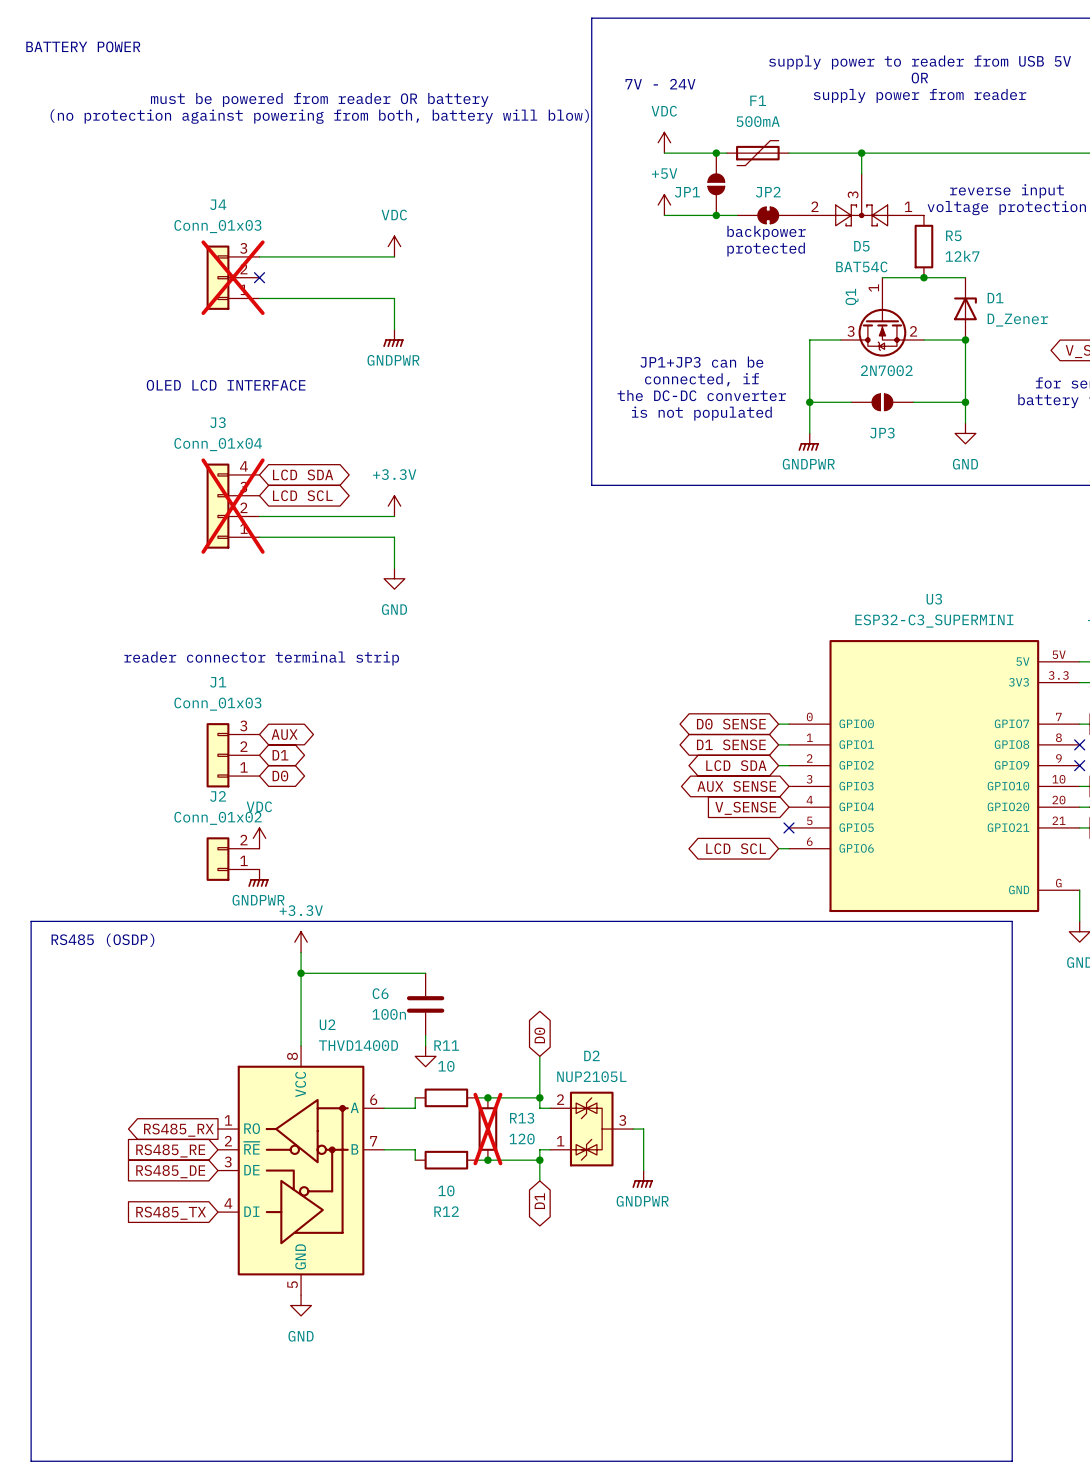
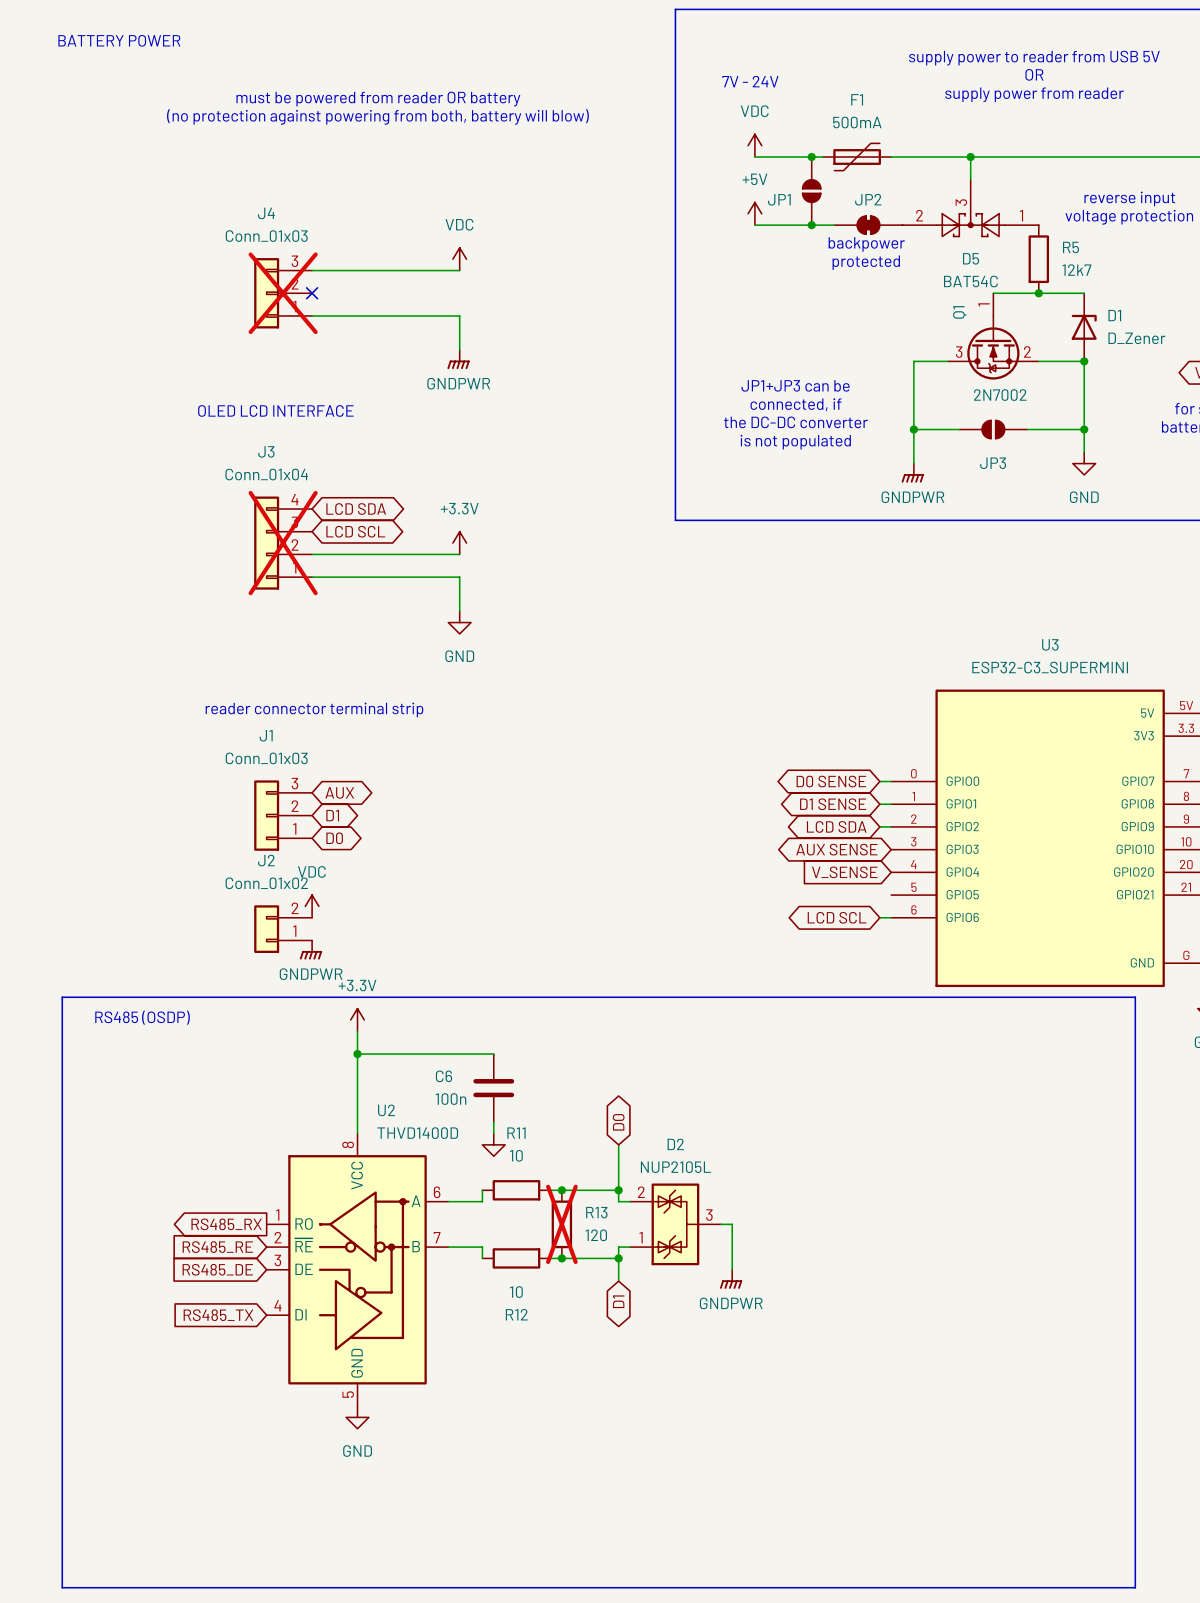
no-connect mark: (788, 827) -> none

